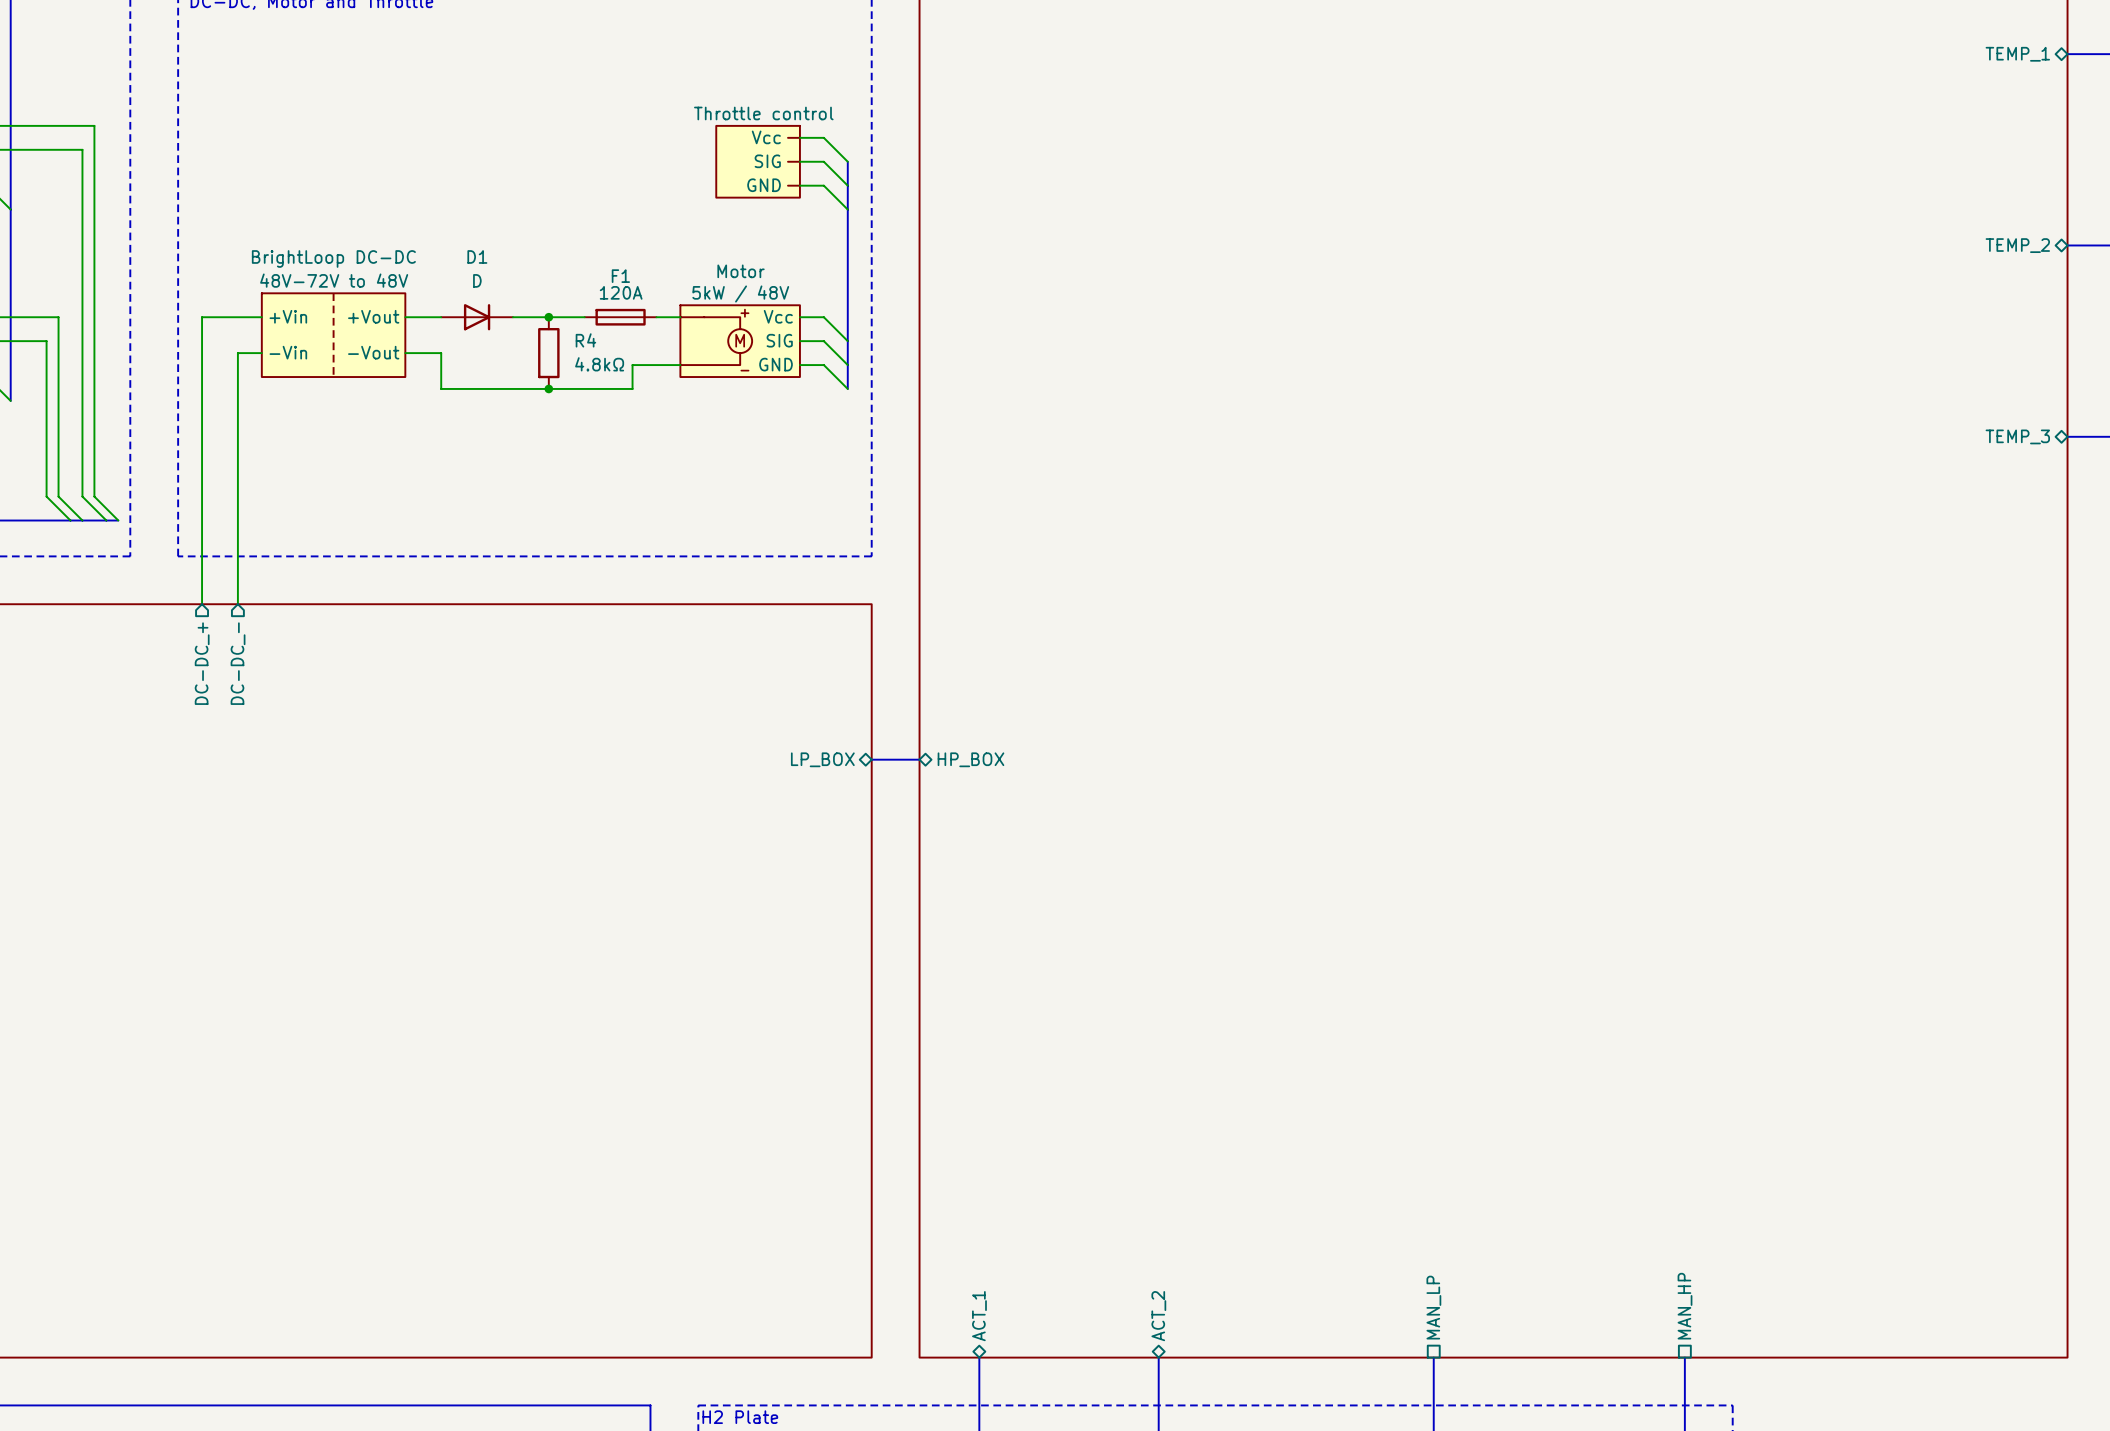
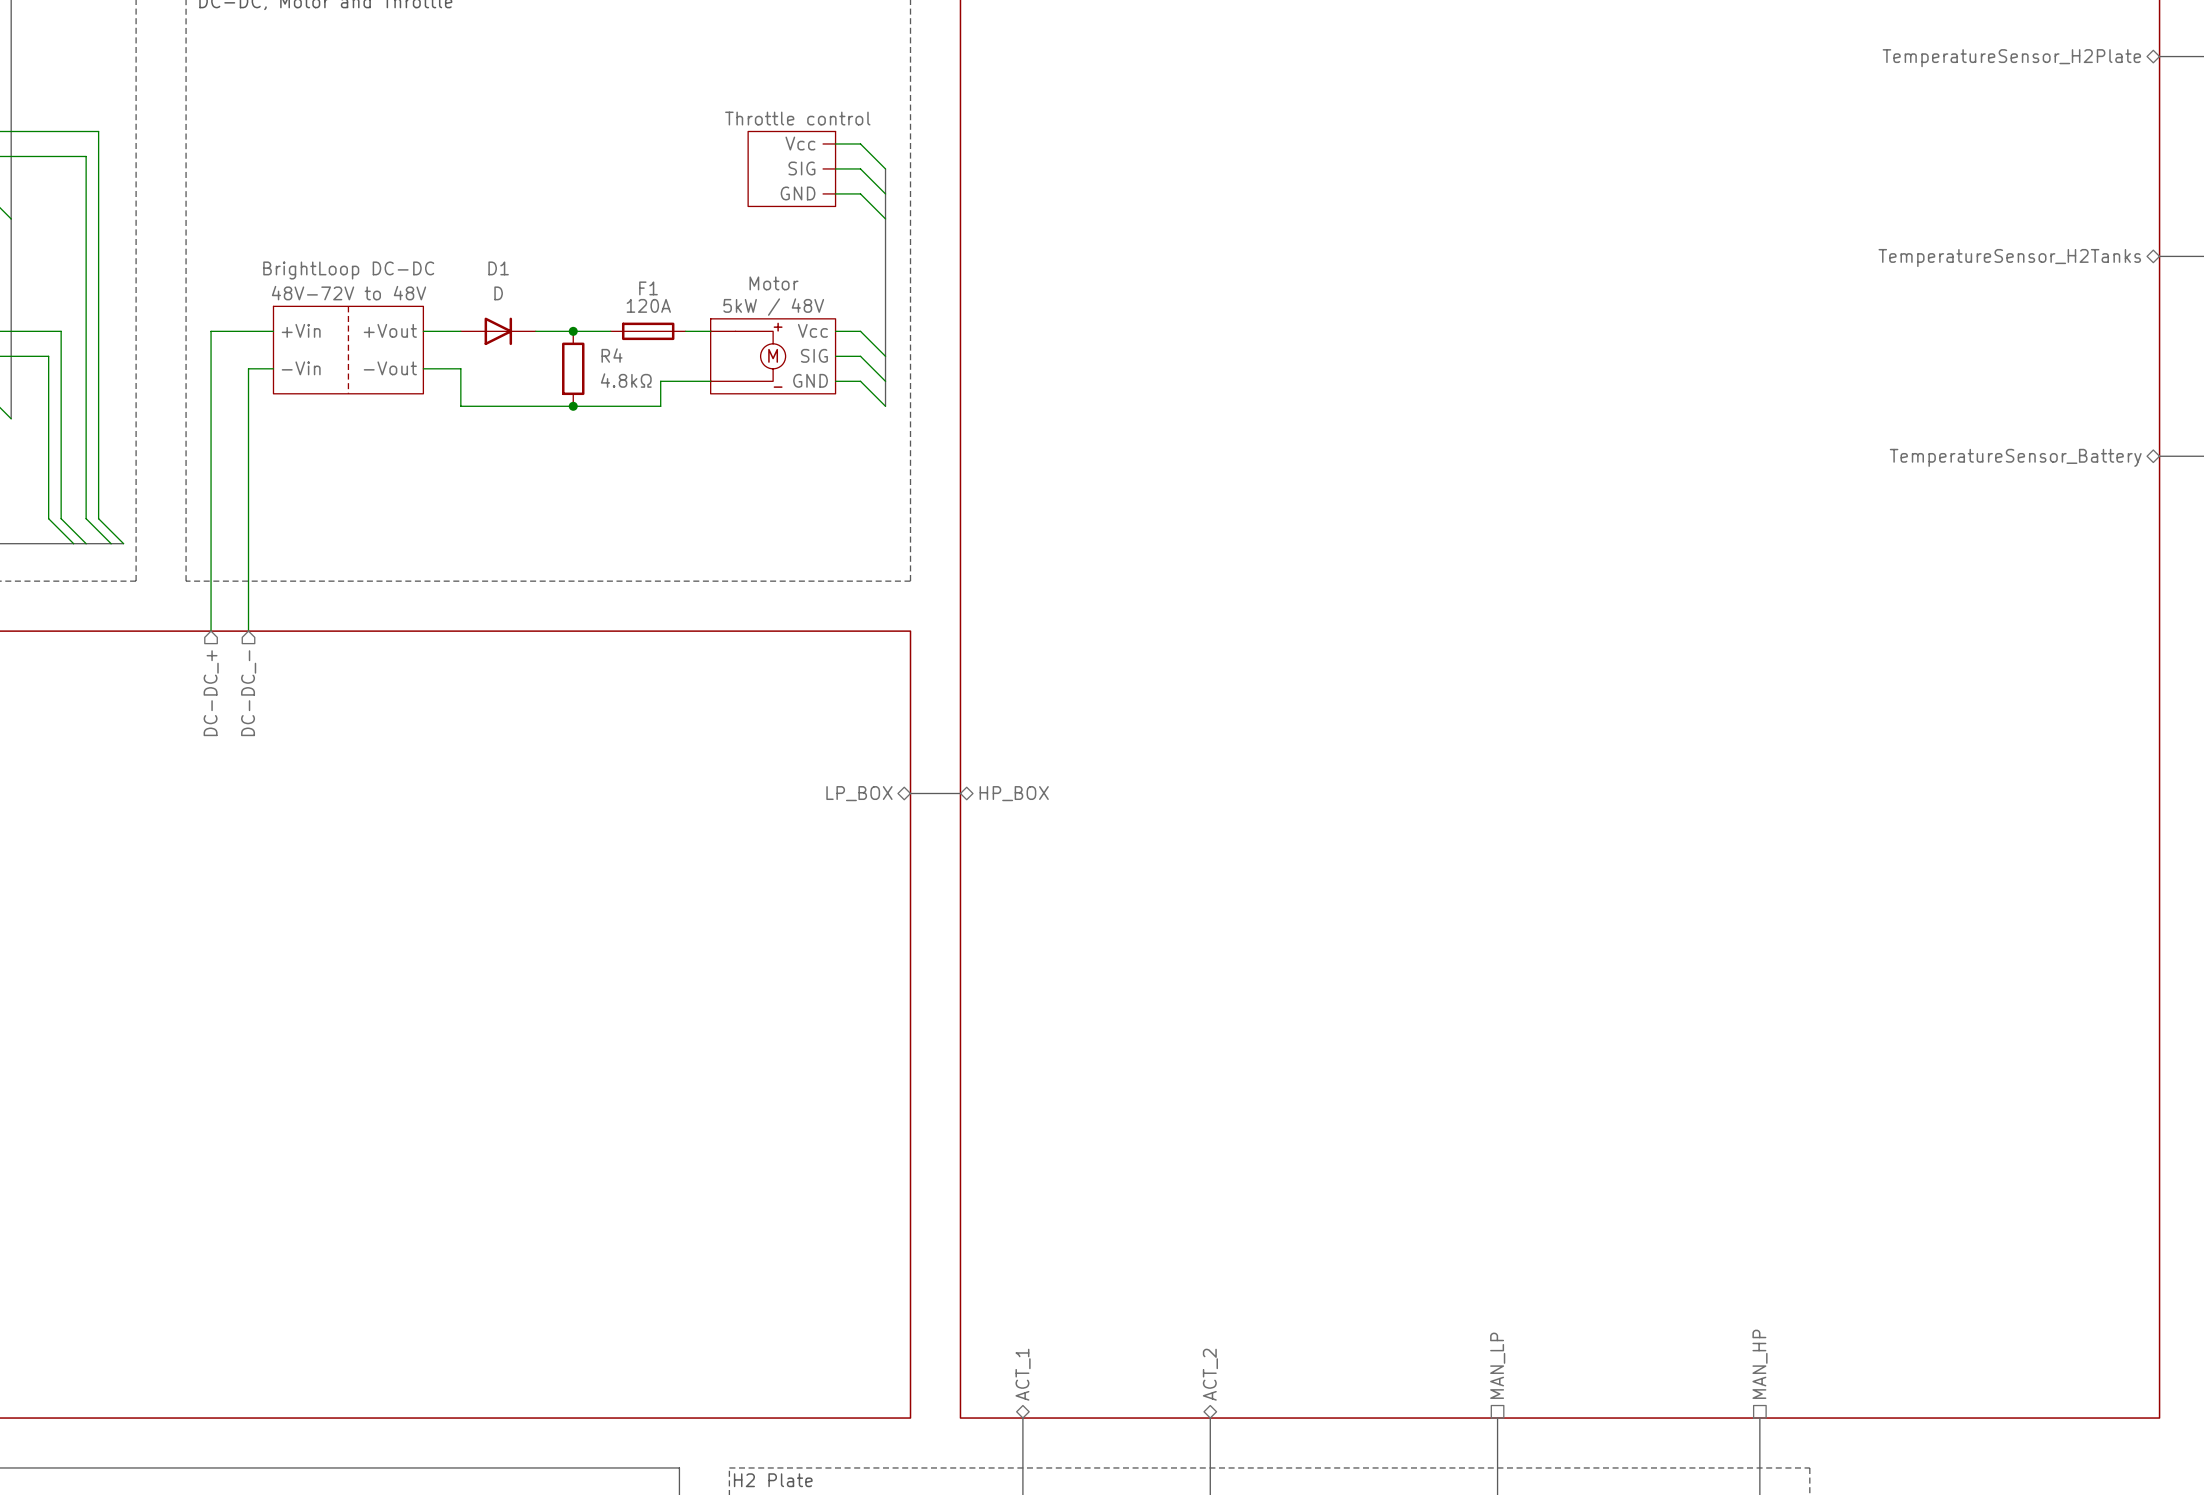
sheet pin: TEMP_1 (2017, 54) -> TemperatureSensor_H2Plate (2011, 58)
sheet pin: TEMP_2 (2017, 245) -> TemperatureSensor_H2Tanks (2009, 258)
sheet pin: TEMP_3 (2017, 436) -> TemperatureSensor_Battery (2015, 457)

